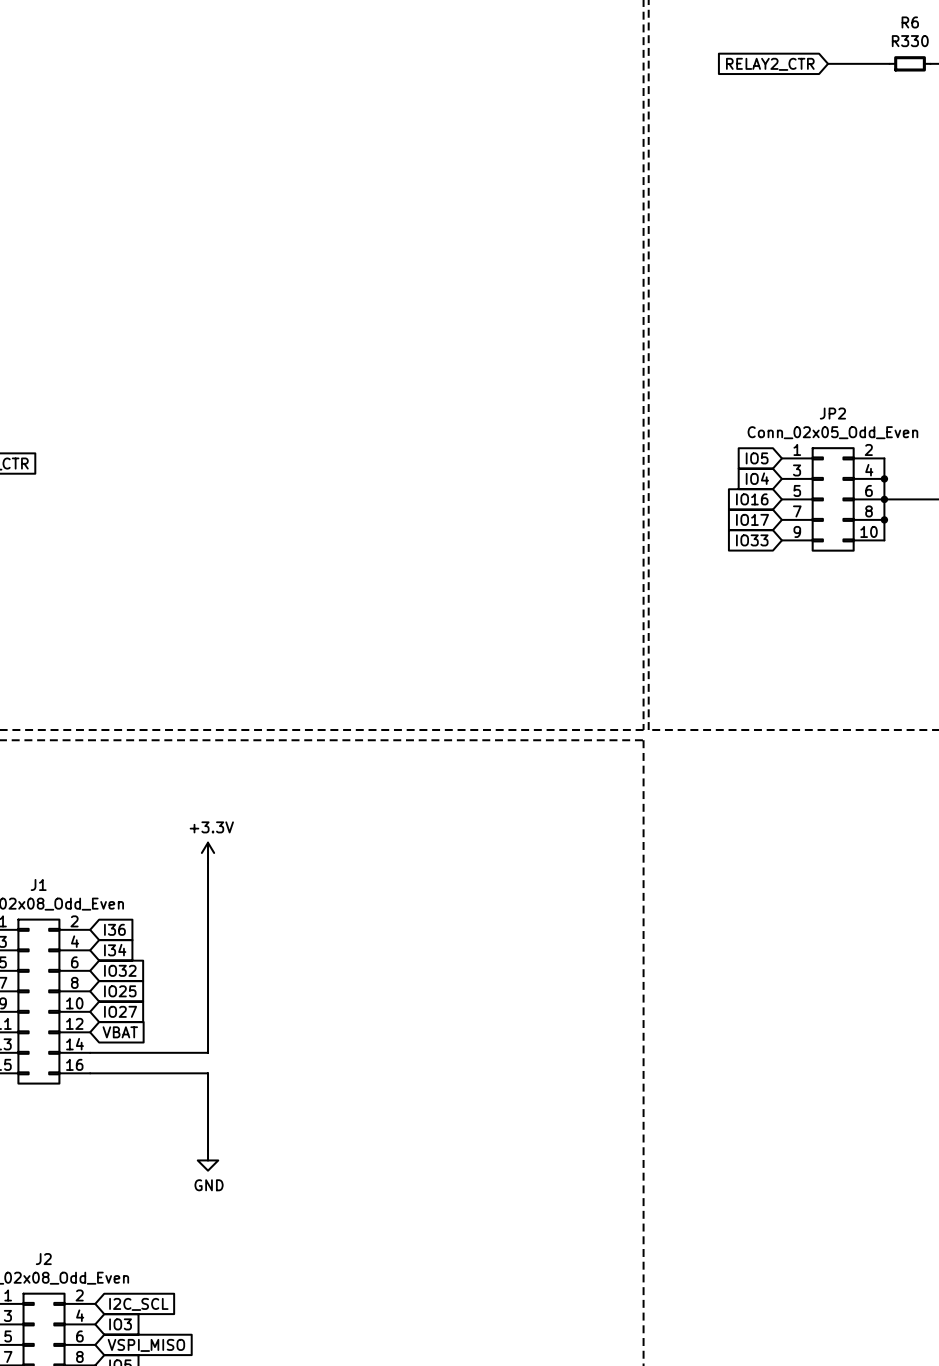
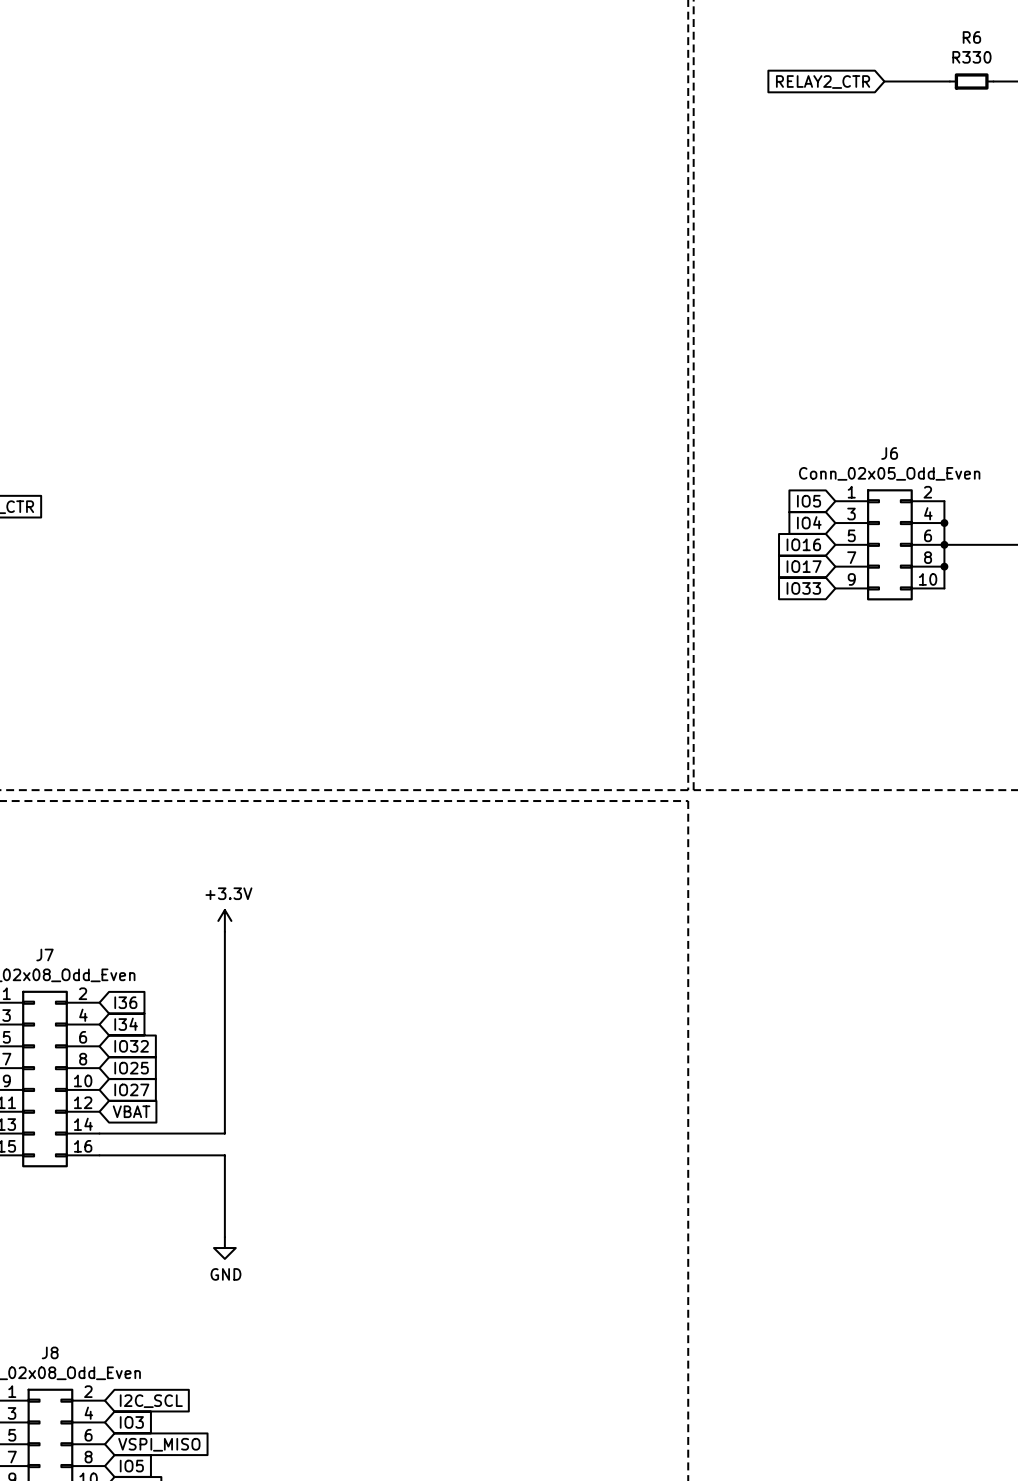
JP2 name: JP2 (832, 413) -> J6 (889, 453)
J1 name: J1 (38, 884) -> J7 (45, 955)
J2 name: J2 (43, 1259) -> J8 (50, 1352)

